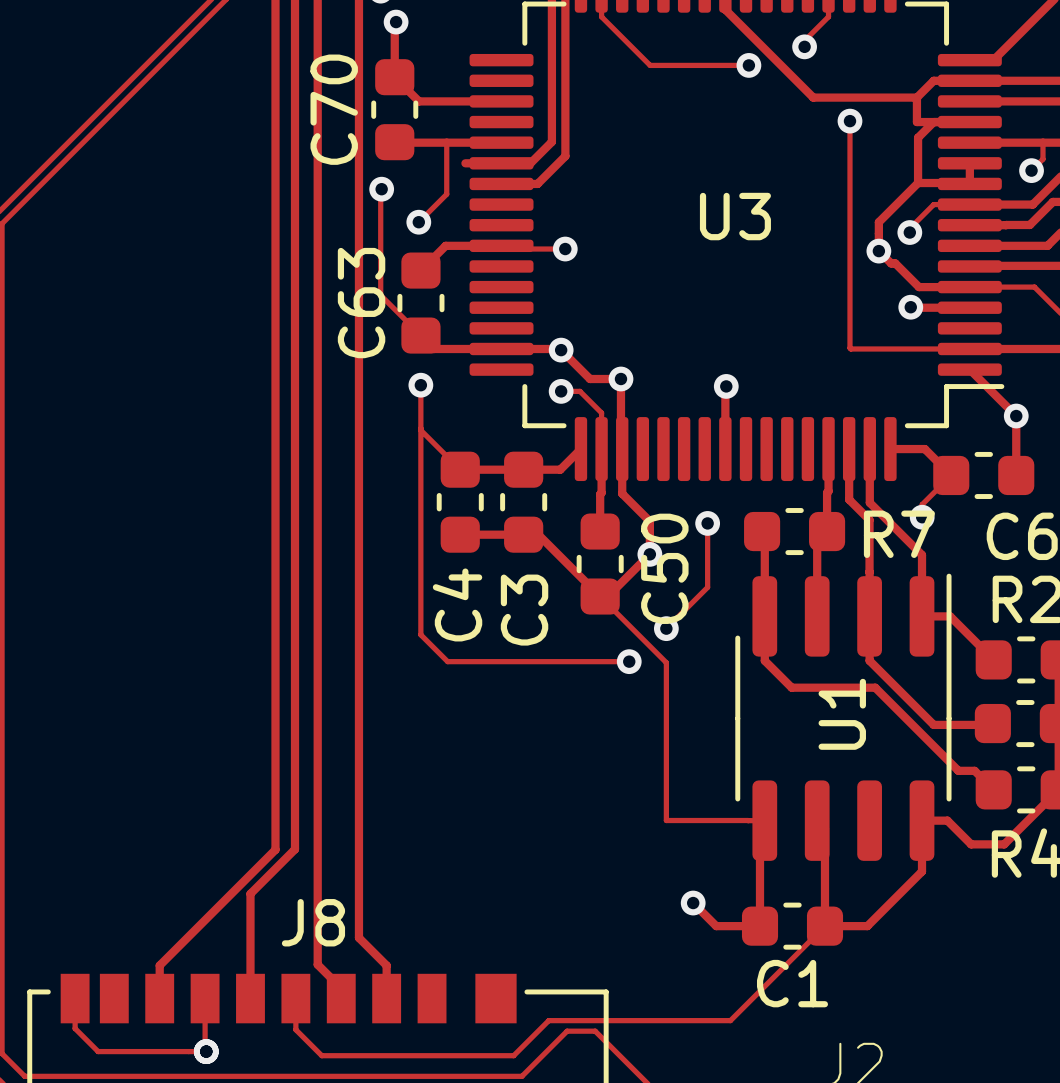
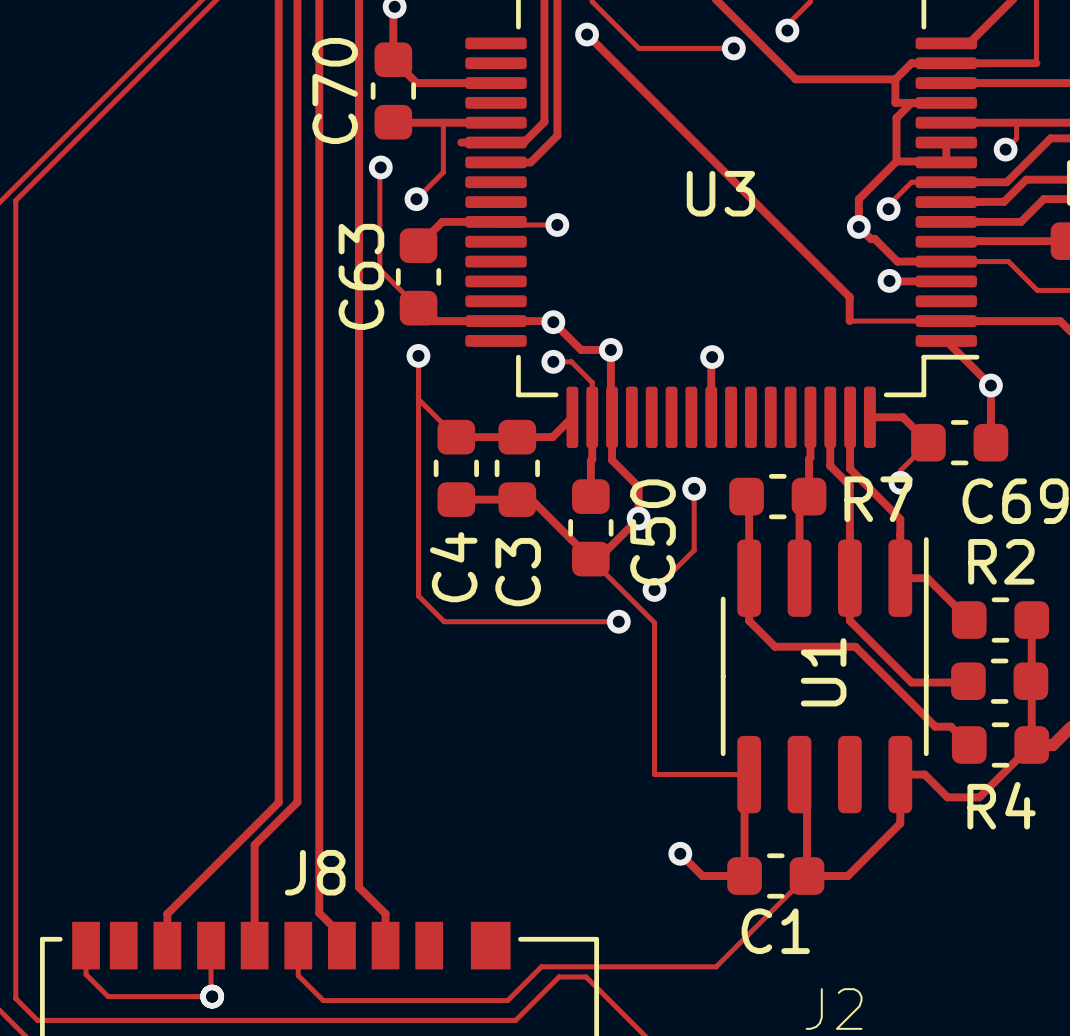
via: none -> (587, 34)
track: (849, 121) (849, 348) (869, 348) -> (587, 34) (849, 297) (849, 321)
via: (849, 121) -> none

